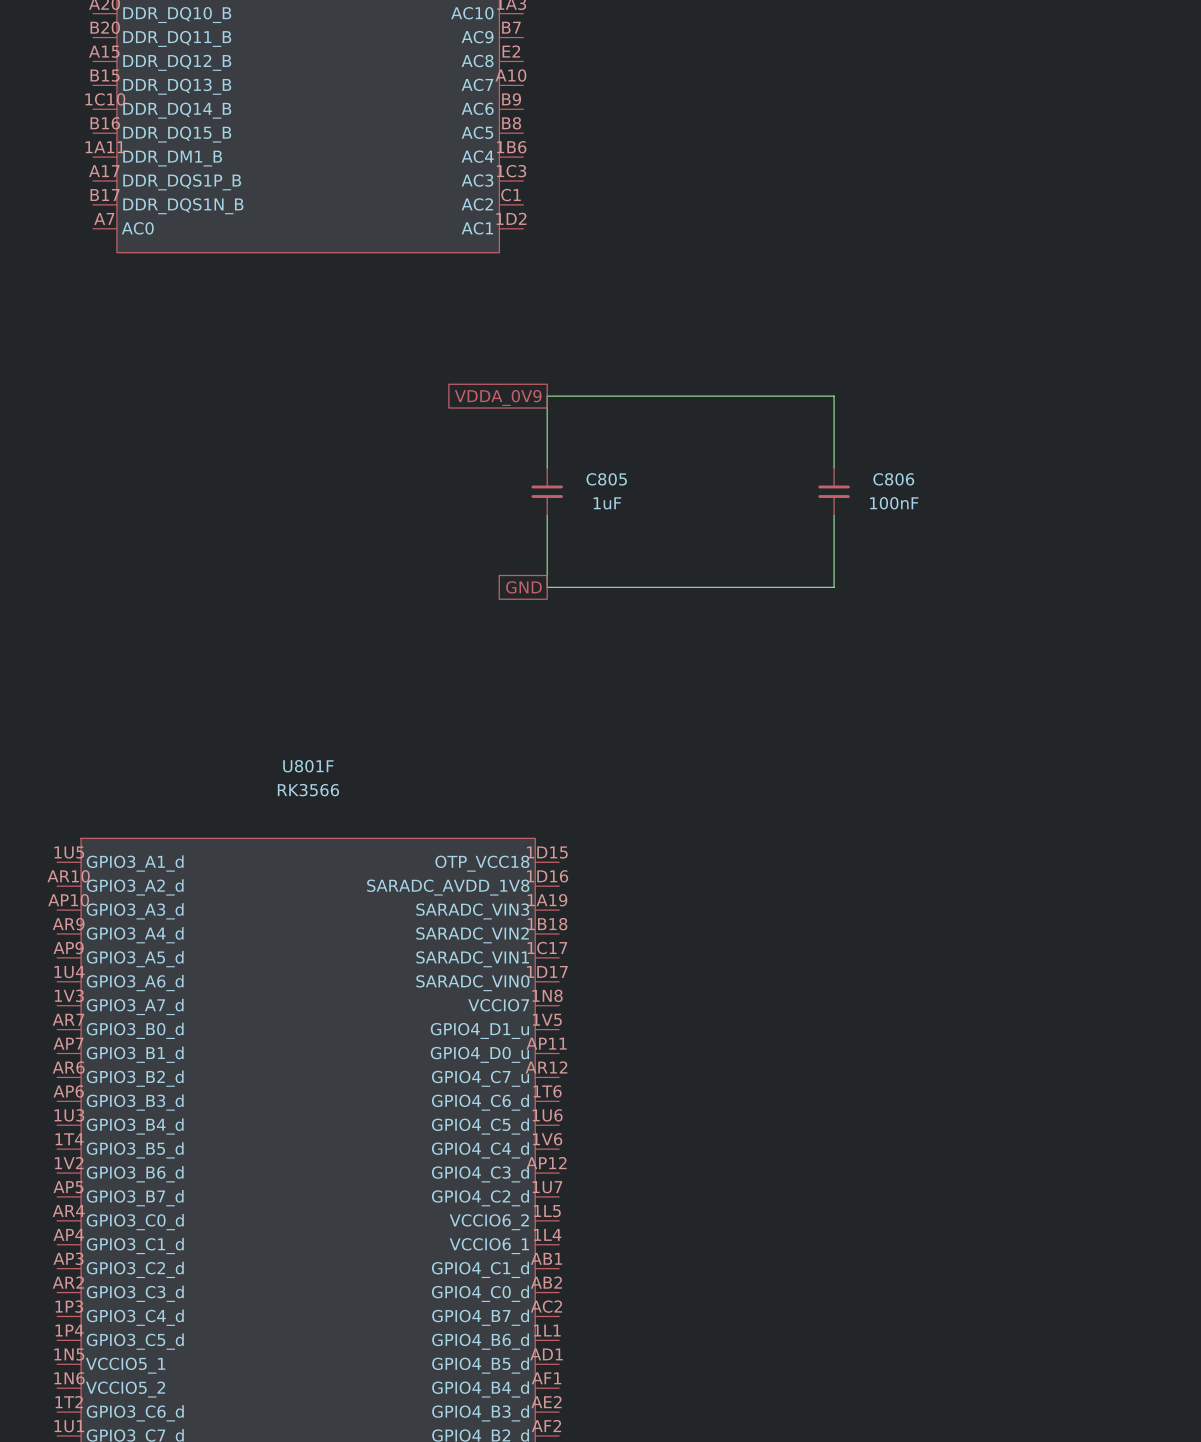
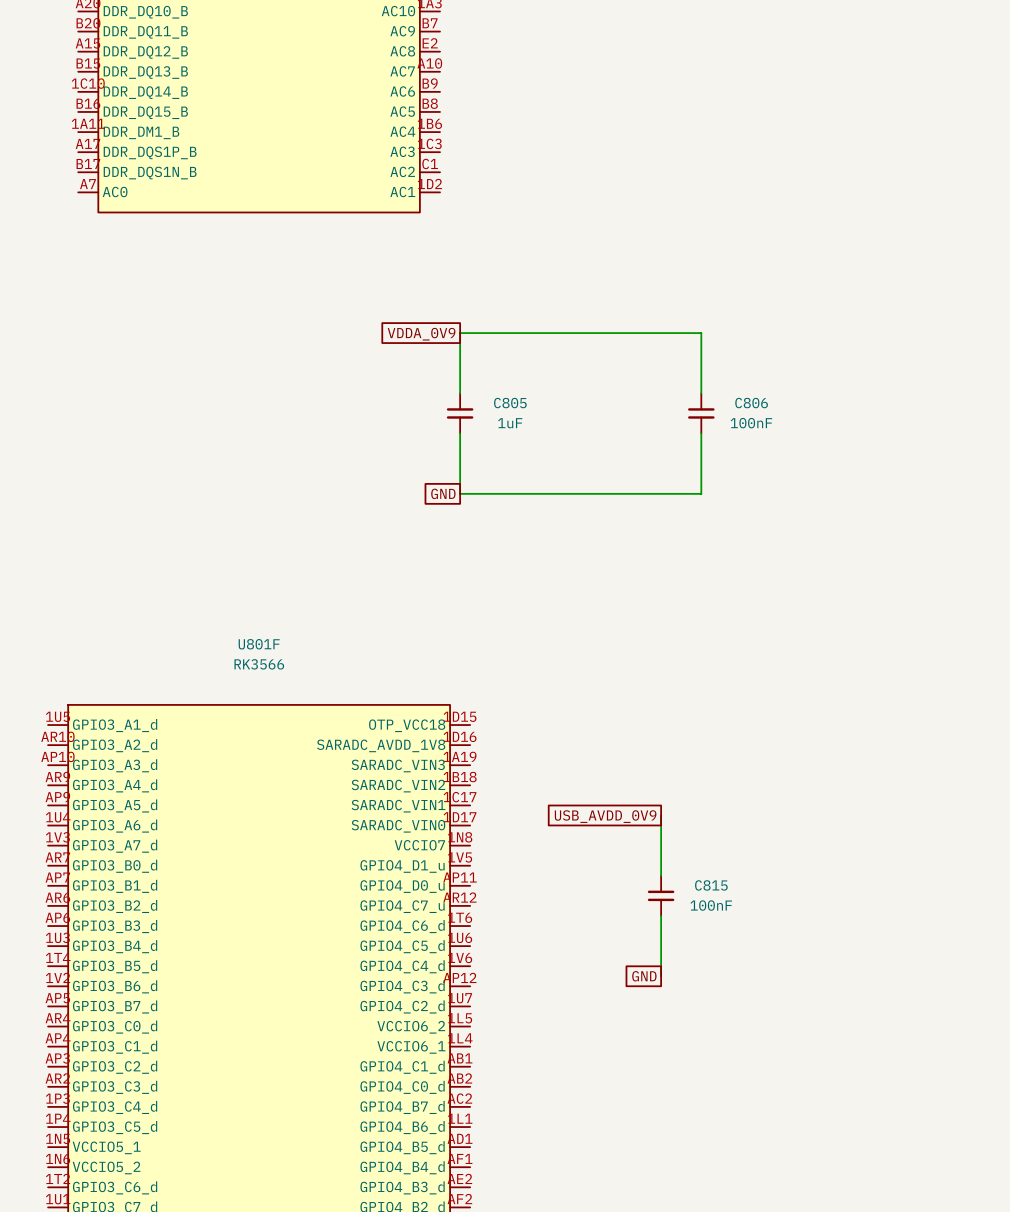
wire: none -> (661, 815) (661, 875)
global label: none -> USB_AVDD_0V9 (605, 816)
C815: none -> 100nF (661, 895)
wire: none -> (661, 915) (661, 976)
global label: none -> GND (644, 976)

